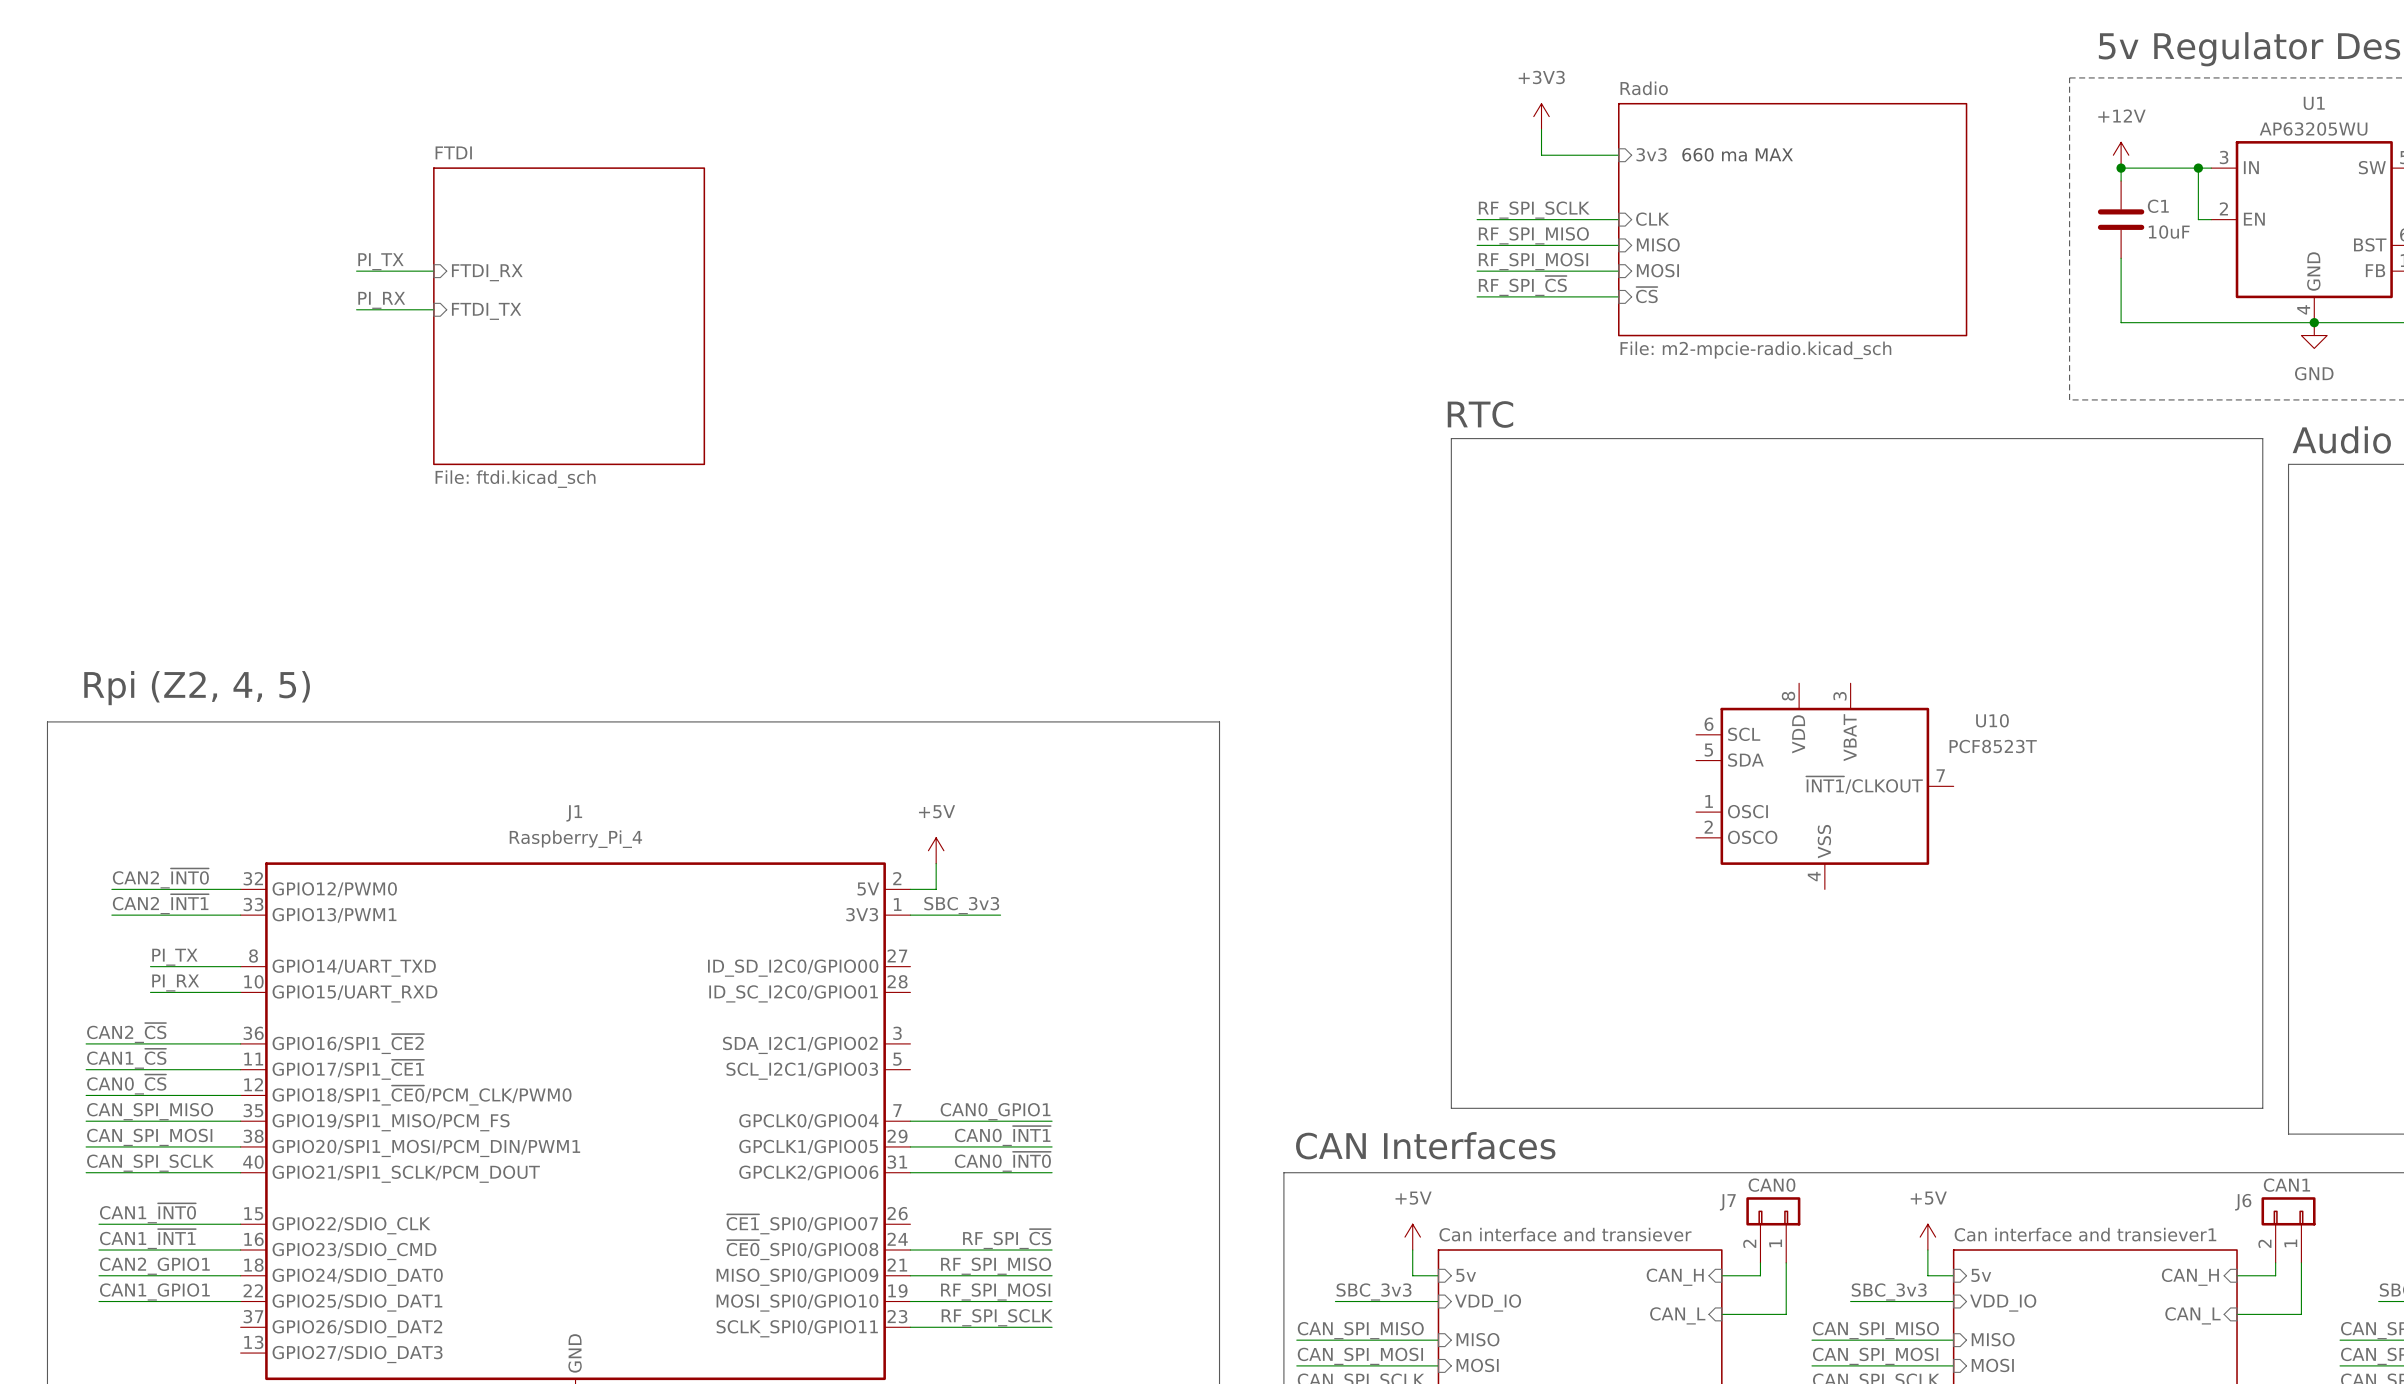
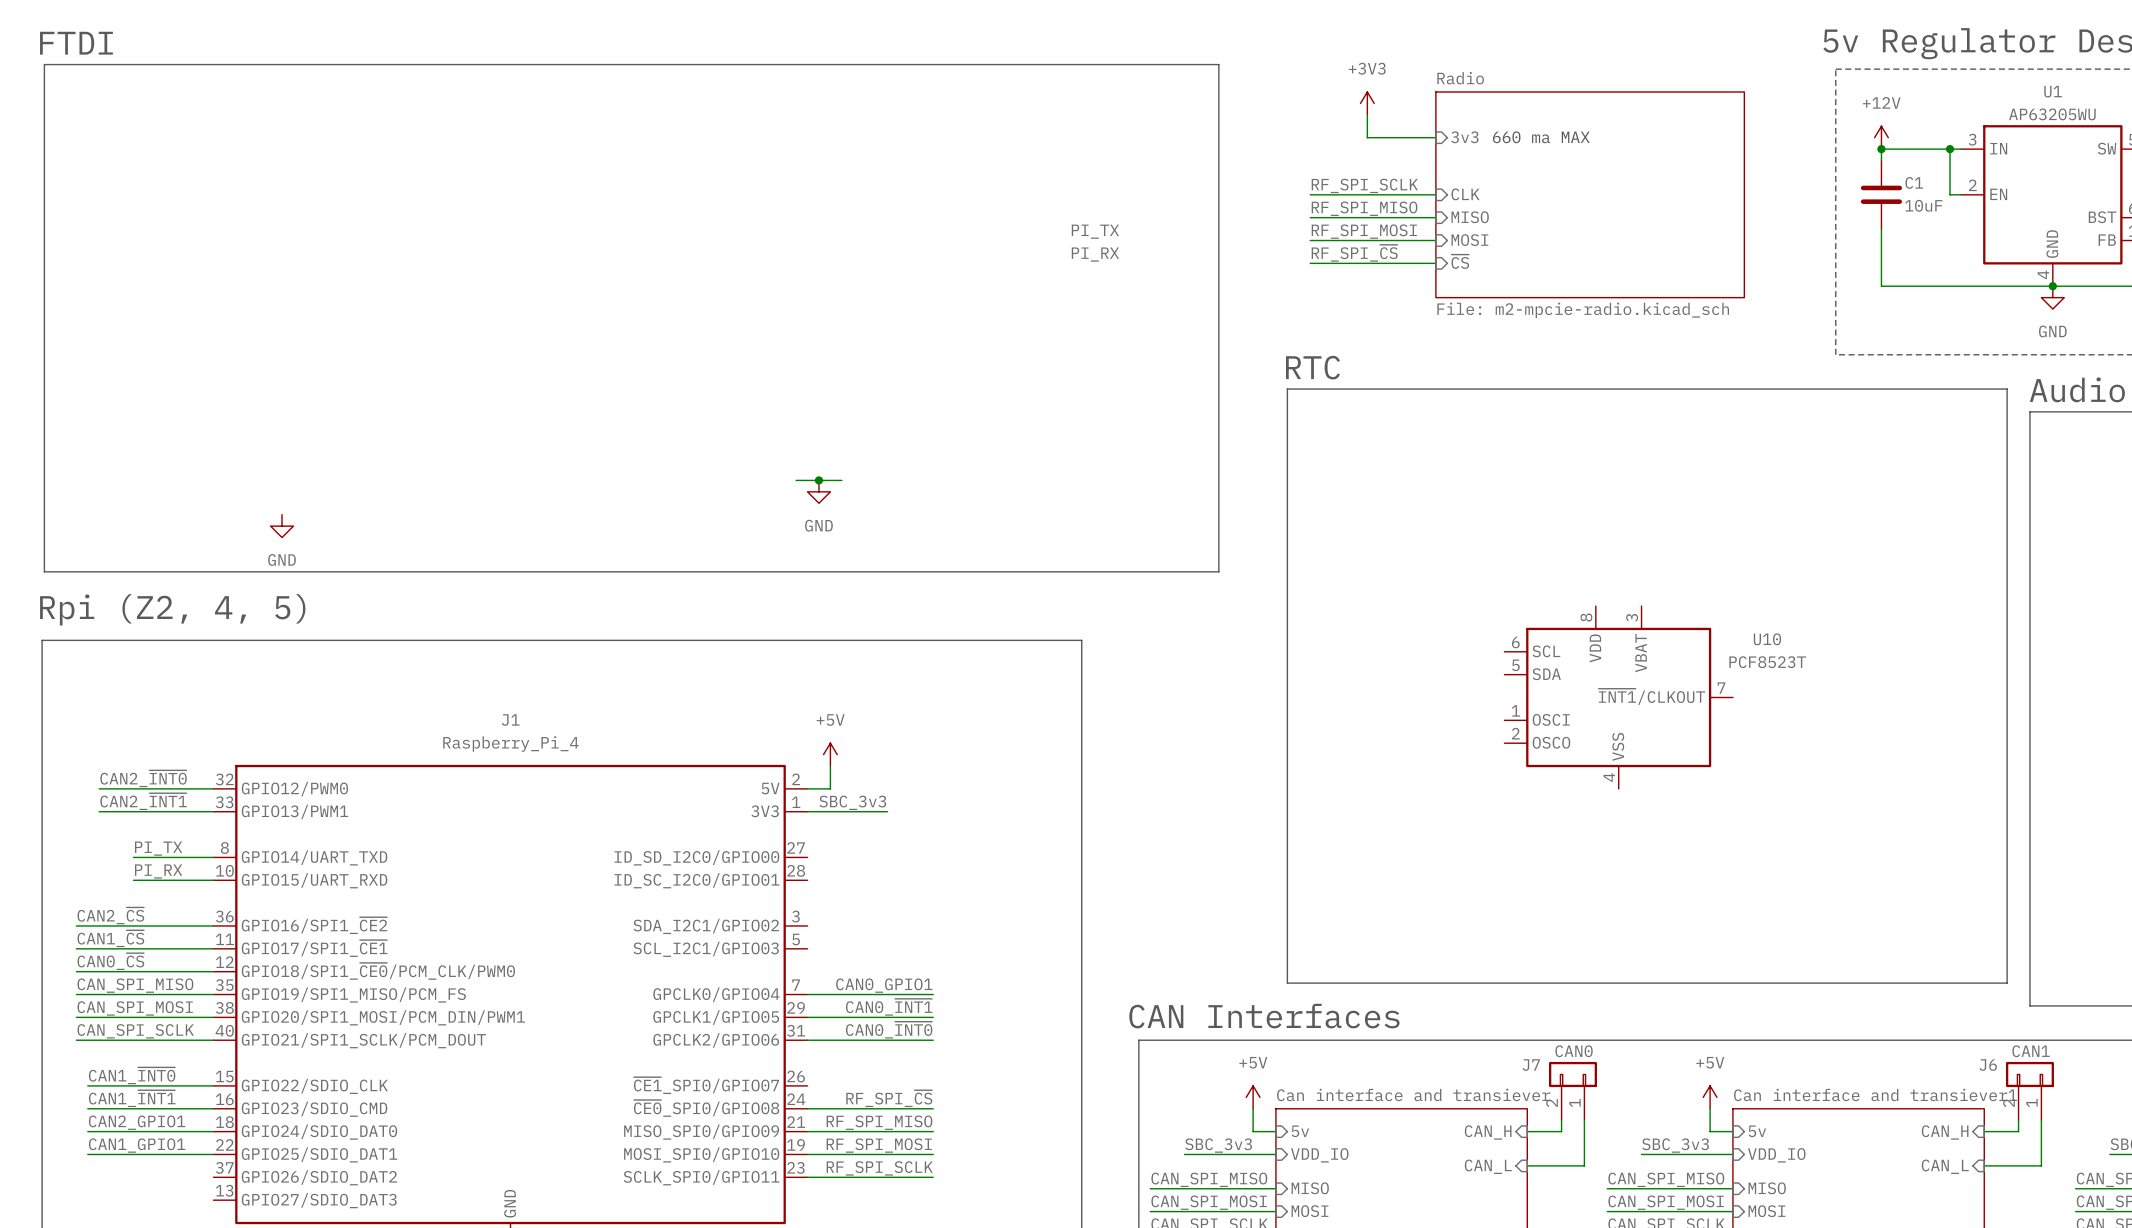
text: none -> FTDI (76, 43)
line: none -> (44, 64) (1218, 64) (1218, 571) (44, 571) (44, 64)
label: PI_TX (380, 261) -> none
label: none -> PI_TX (1095, 231)
wire: (356, 271) (433, 271) -> none
sheet pin: FTDI_RX (487, 272) -> none
label: none -> PI_RX (1095, 254)
label: PI_RX (381, 300) -> none
wire: (356, 309) (433, 309) -> none
sheet pin: FTDI_TX (486, 311) -> none
sheet FTDI: File: ftdi.kicad_sch (569, 316) -> none
wire: none -> (796, 480) (841, 480)
junction: none -> (818, 480)
power symbol: none -> GND (818, 491)
power symbol: none -> GND (282, 526)

